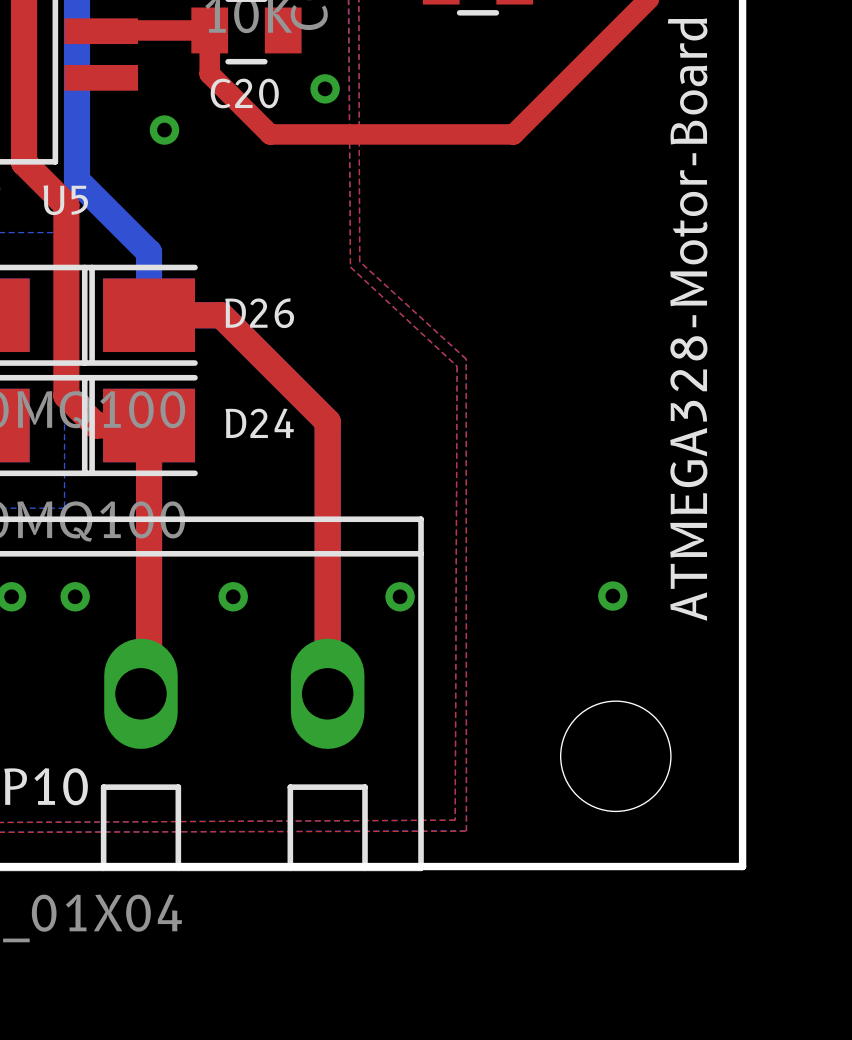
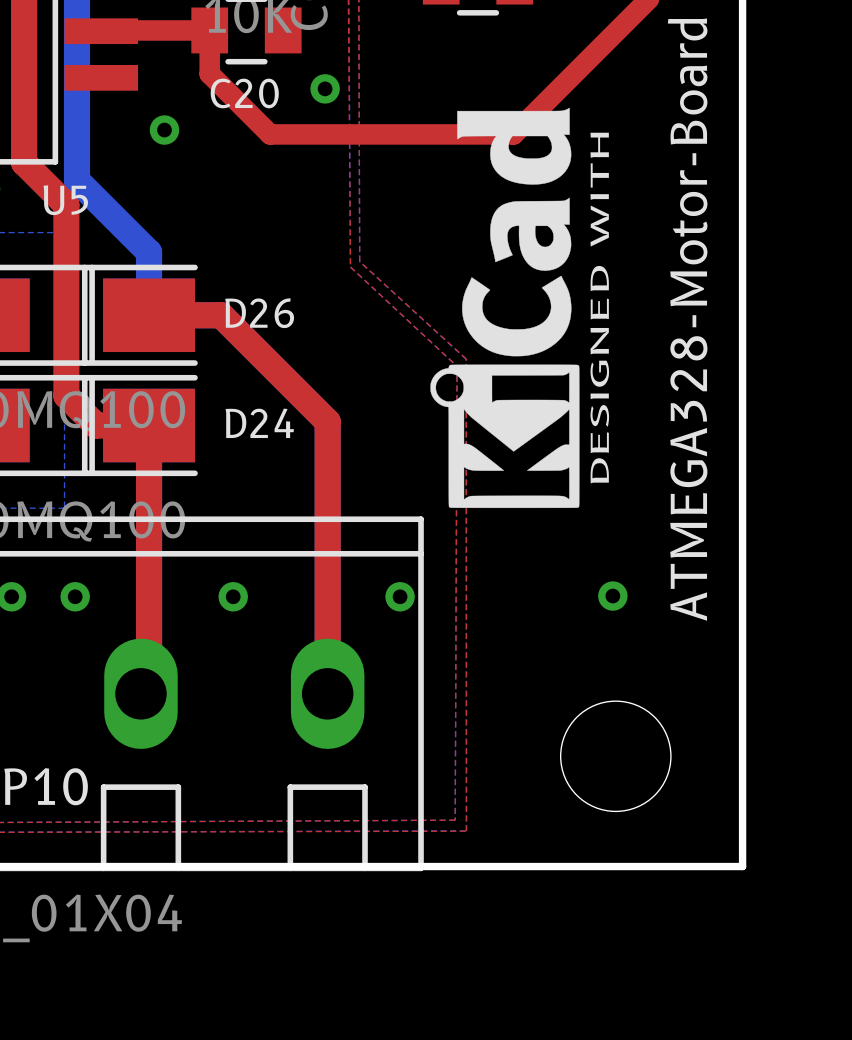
drawing: none -> [430, 107, 580, 509]

